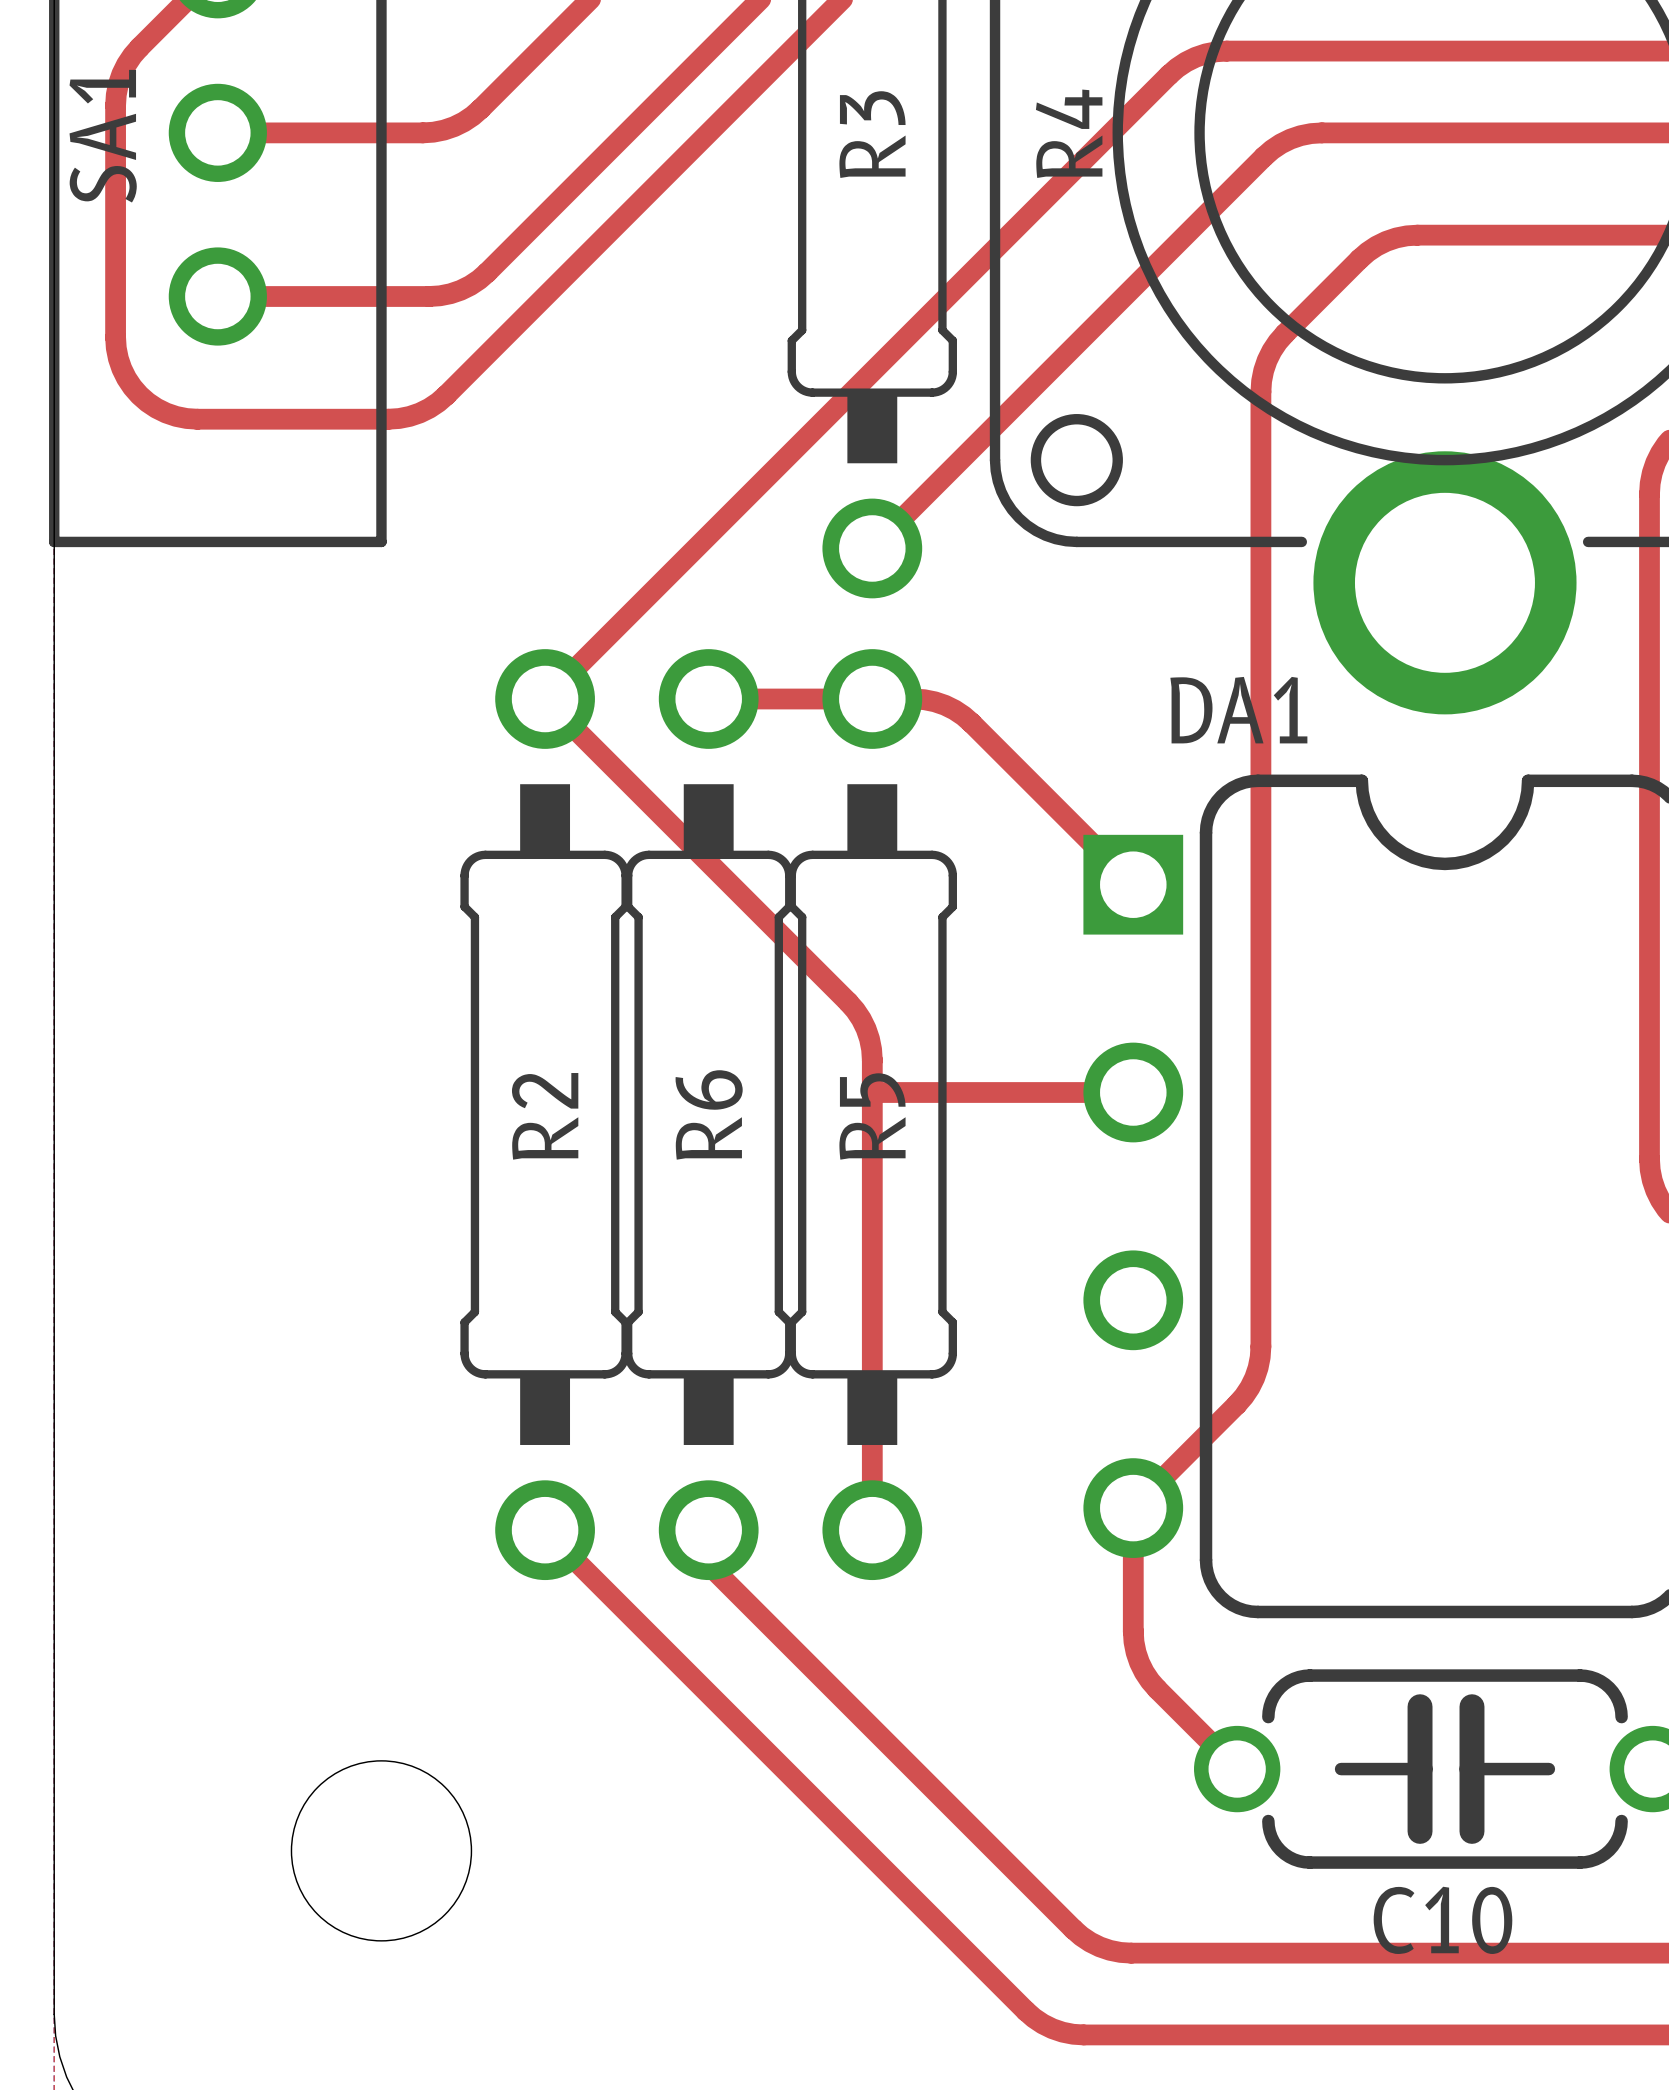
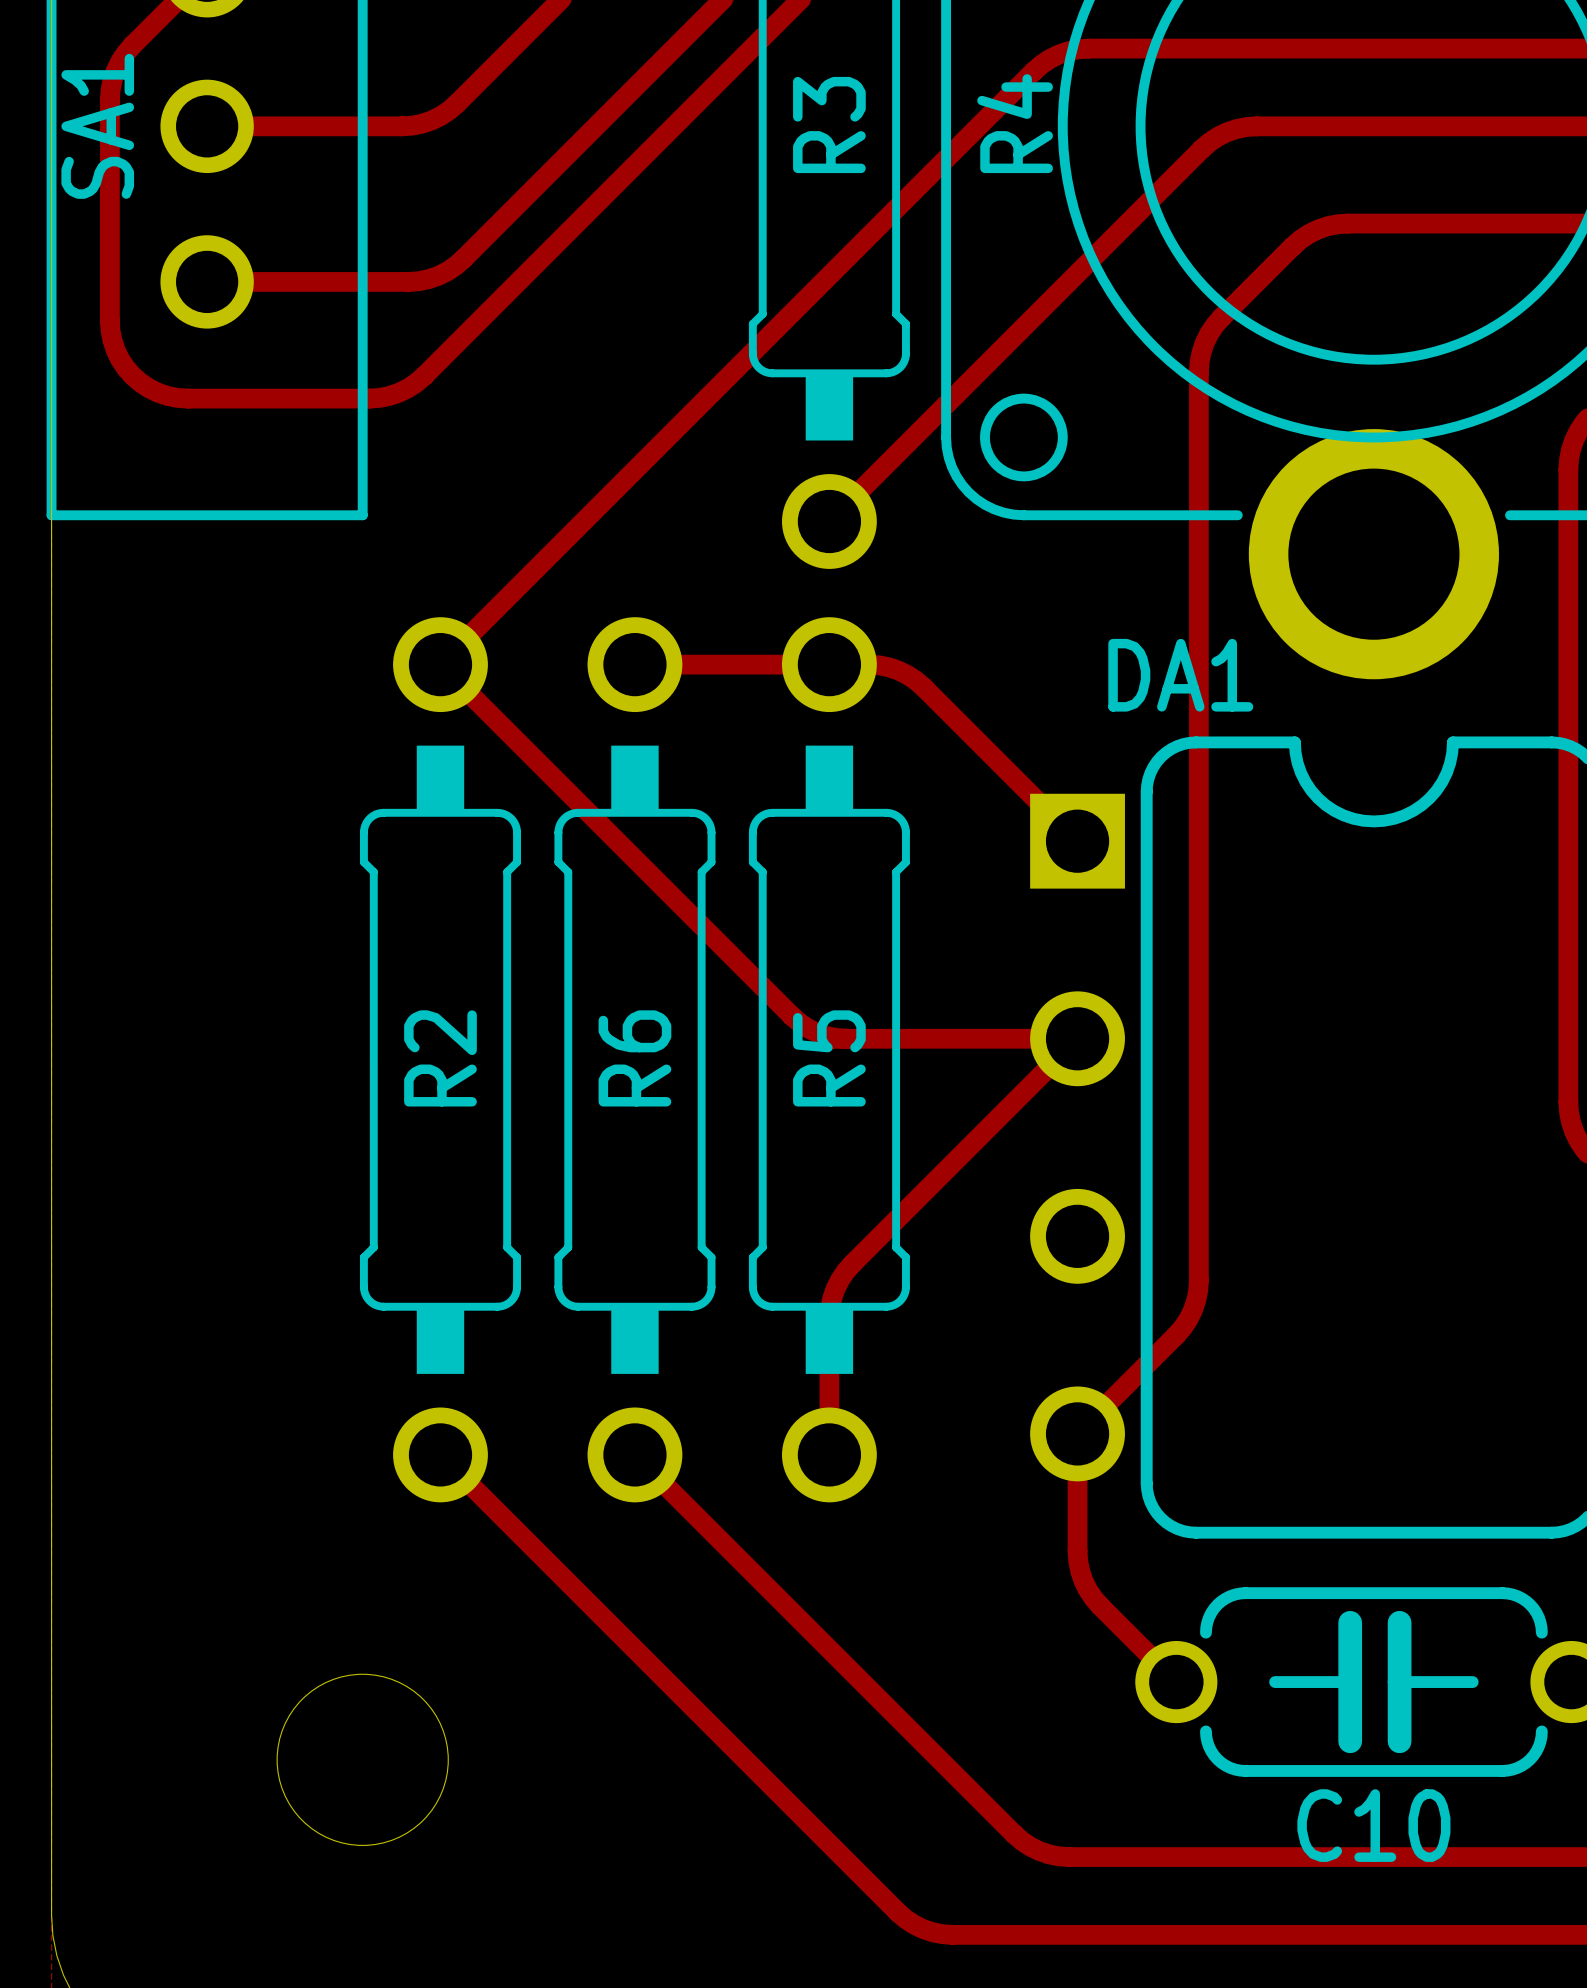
top track: (1226, 51) (1195, 57) (1169, 75) (545, 699) (848, 1002) (866, 1028) (872, 1060) (872, 1387) -> (1166, 48) (1078, 49) (1059, 54) (1041, 64) (440, 664) (791, 1015) (817, 1032) (846, 1038)
top track: none -> (1077, 1038) (852, 1264) (835, 1289) (829, 1319)
R2 position: (545, 1114) -> (440, 1059)
R6 position: (708, 1114) -> (634, 1059)
top track: (545, 1530) (1025, 2010) (1052, 2028) (1083, 2034) -> (440, 1454) (905, 1918) (922, 1928) (942, 1934) (1030, 1934)
top track: (708, 1530) (708, 1564) (1073, 1929) (1099, 1946) (1131, 1953) -> (634, 1454) (1014, 1834) (1039, 1851) (1059, 1856) (1075, 1857)

